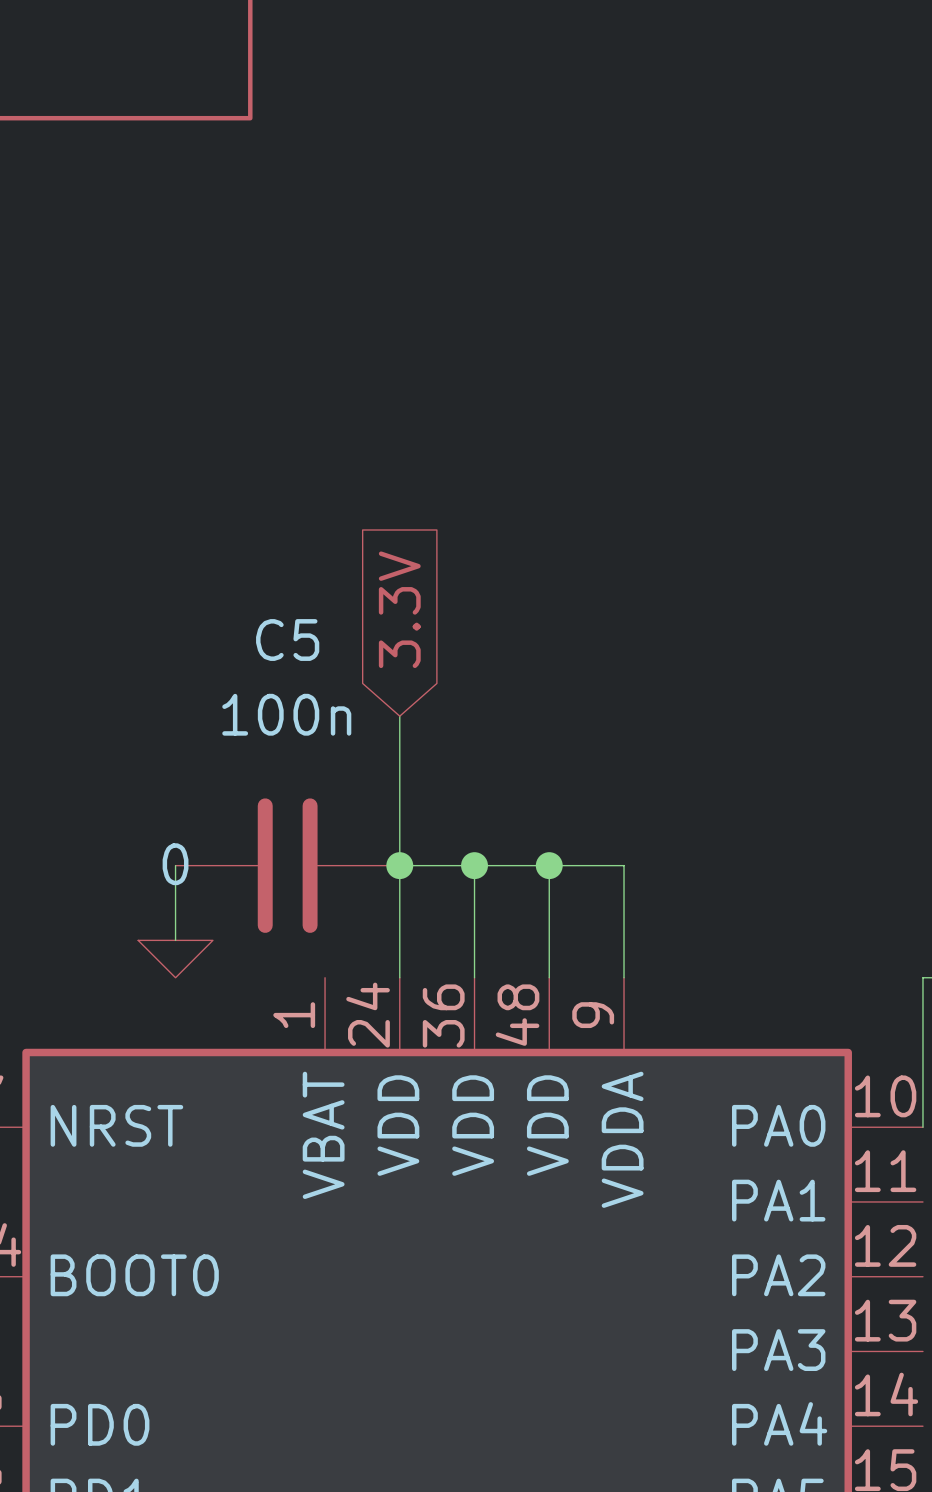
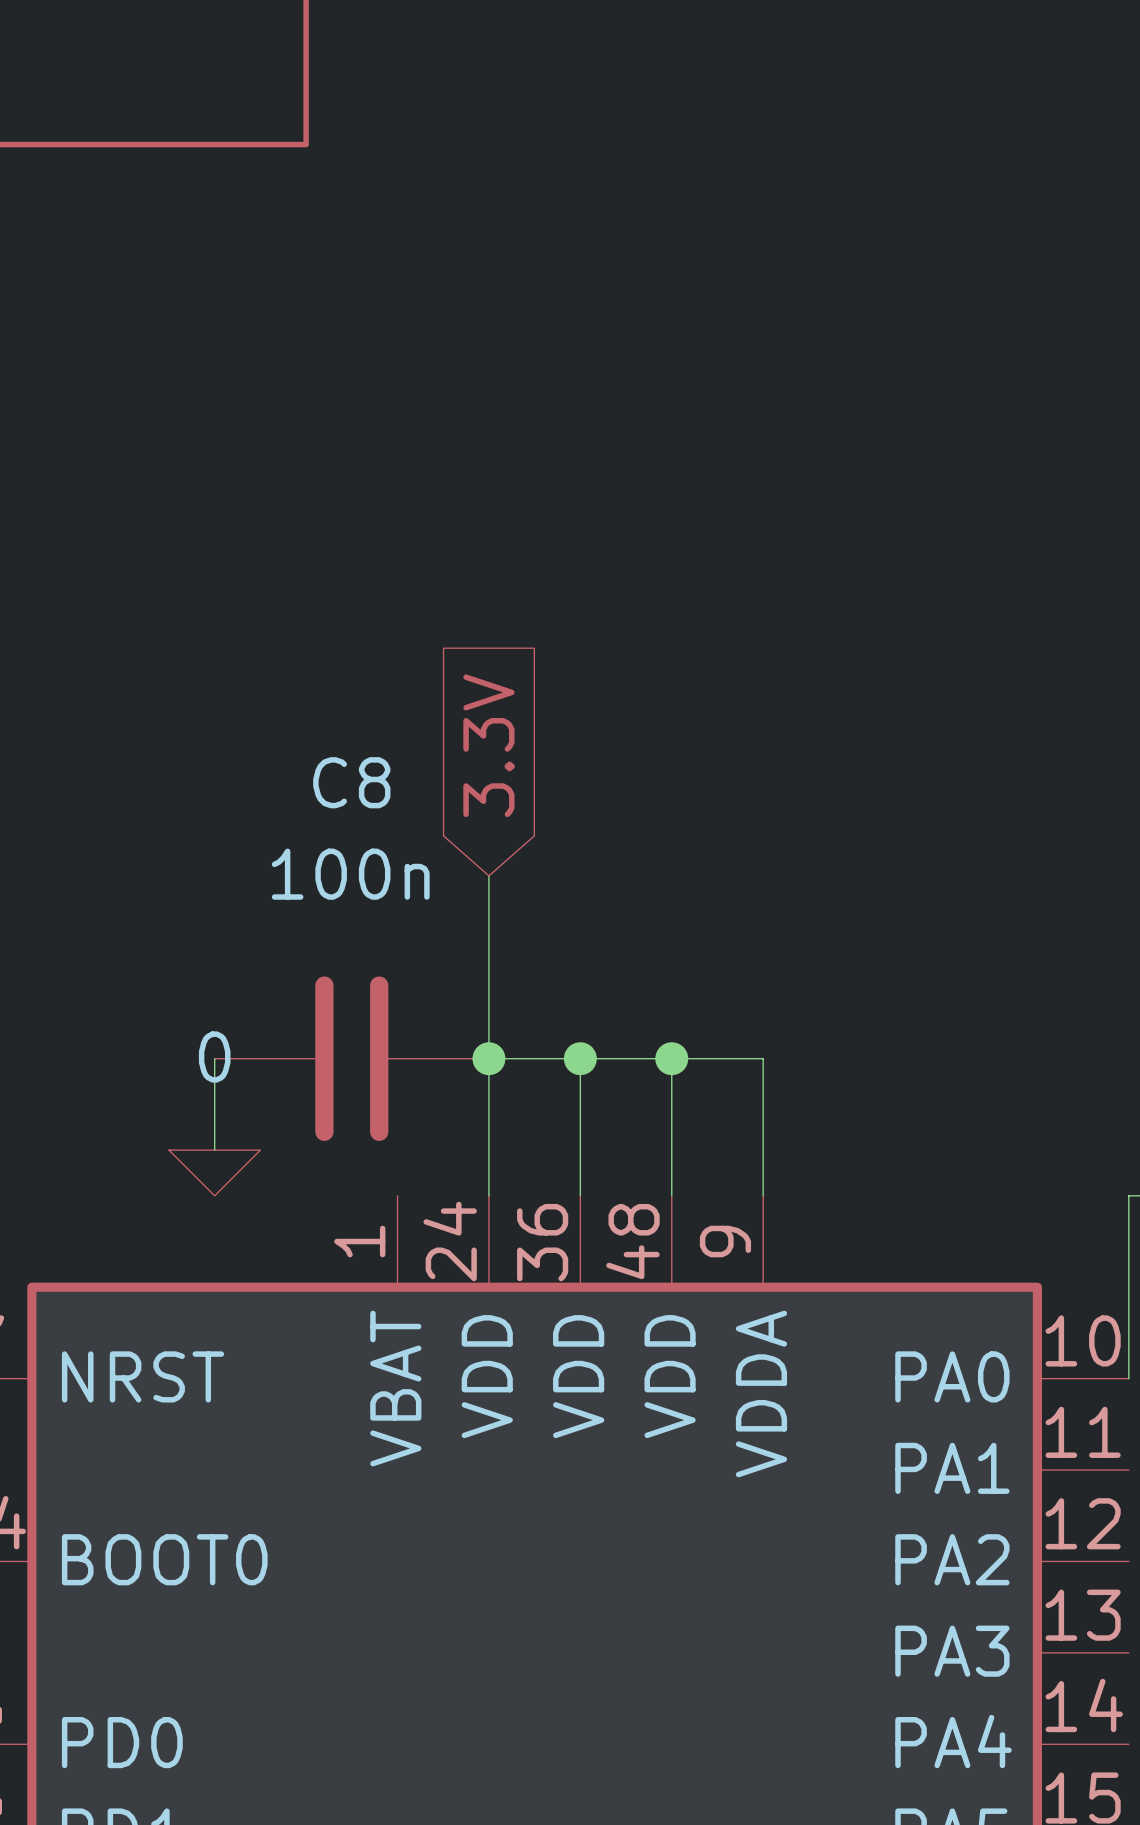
C5 name: C5 (287, 640) -> C8 (351, 782)

